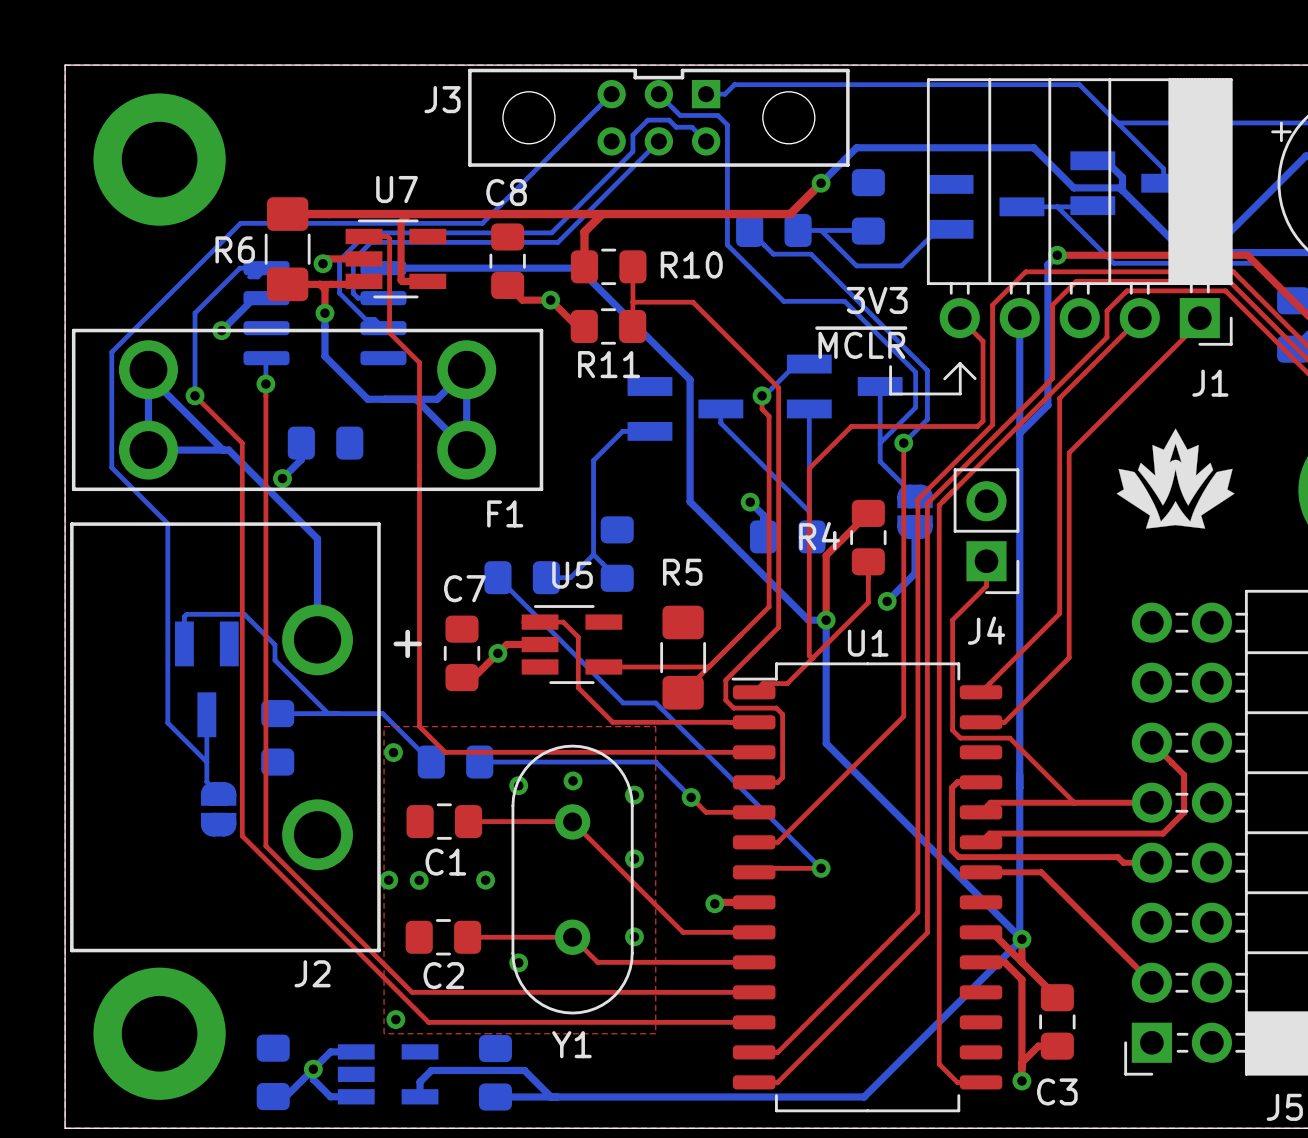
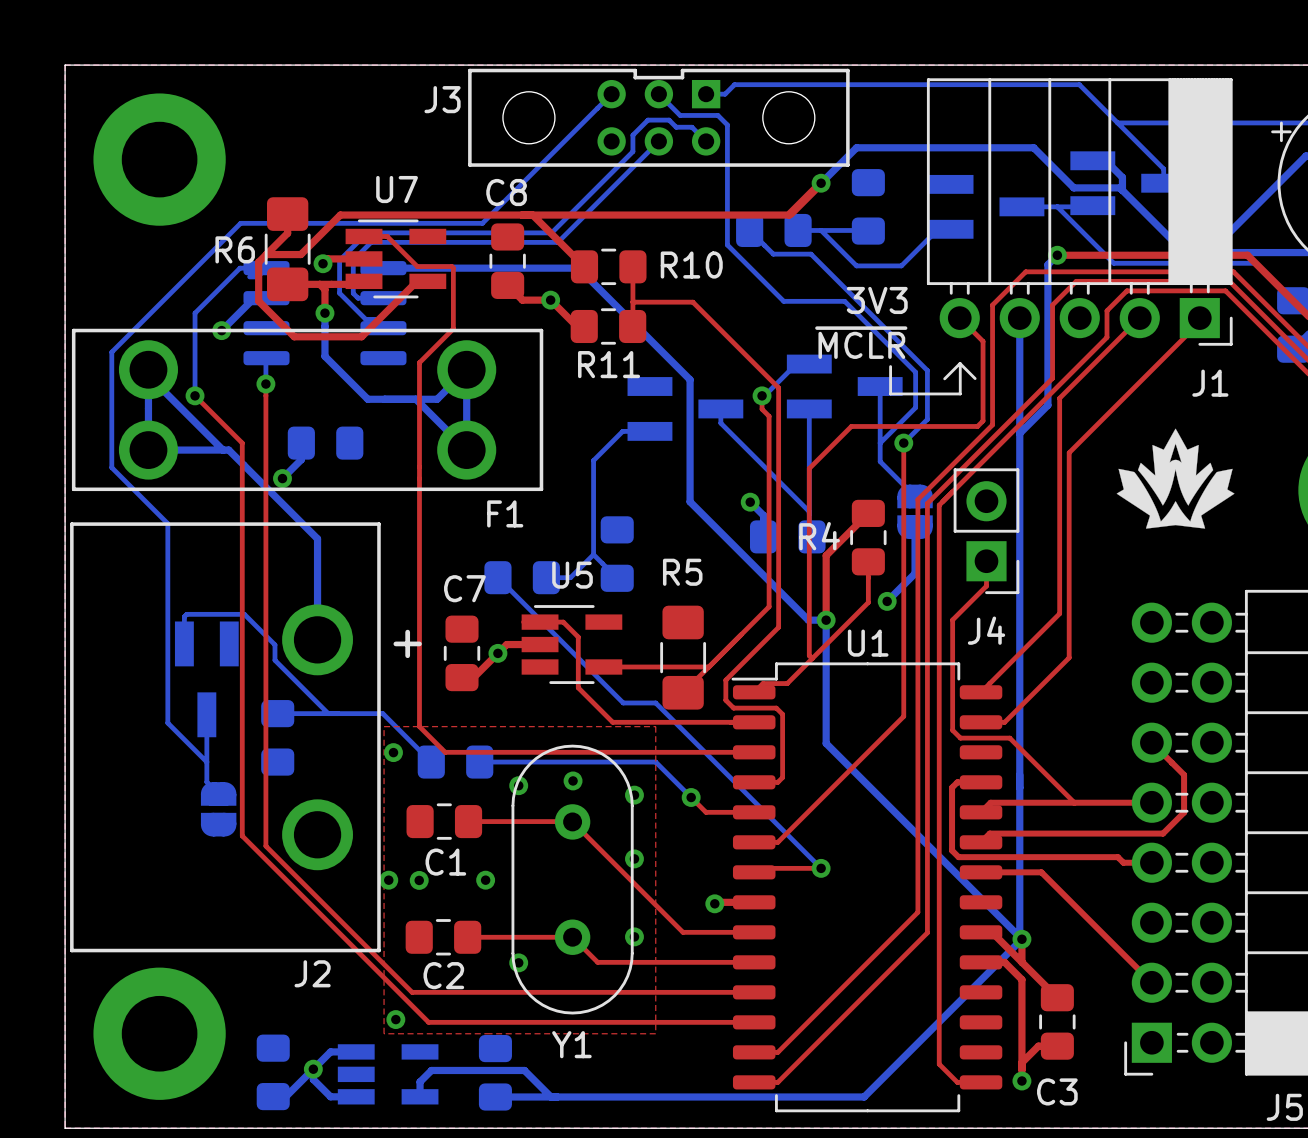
top track: (287, 214) (790, 214) -> (266, 254) (300, 254) (340, 215) (790, 214)
top track: (415, 214) (409, 214) (401, 222) (401, 280) (417, 281) -> (287, 214) (287, 233) (258, 262) (258, 301) (294, 336) (361, 336) (417, 281)
top track: (602, 214) (584, 231) (584, 266) -> (532, 215) (584, 266)
top track: (389, 238) (389, 332) (419, 362) -> (389, 238) (417, 266) (453, 267) (453, 328) (419, 362)

